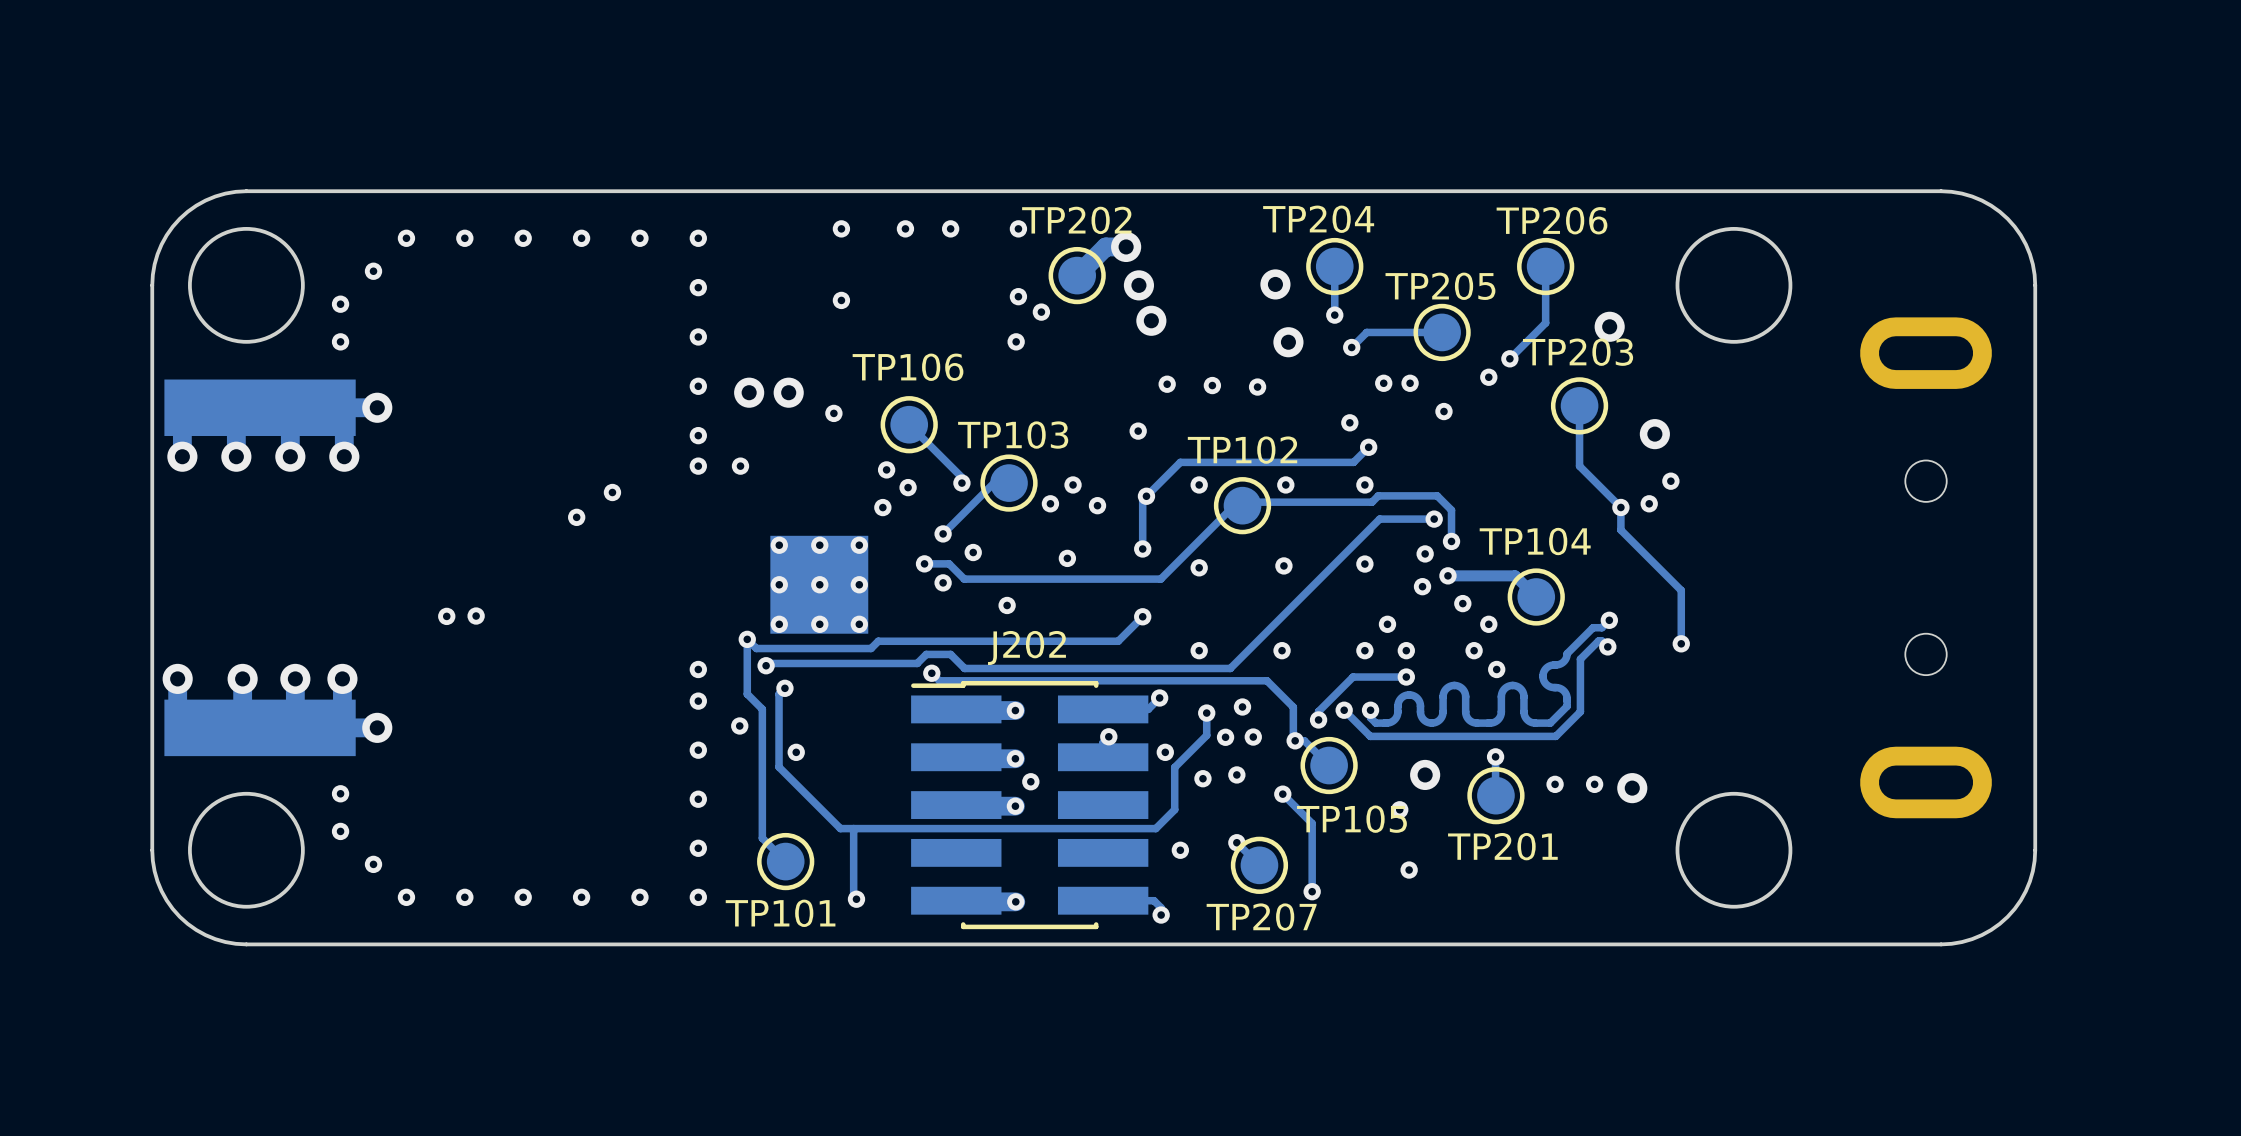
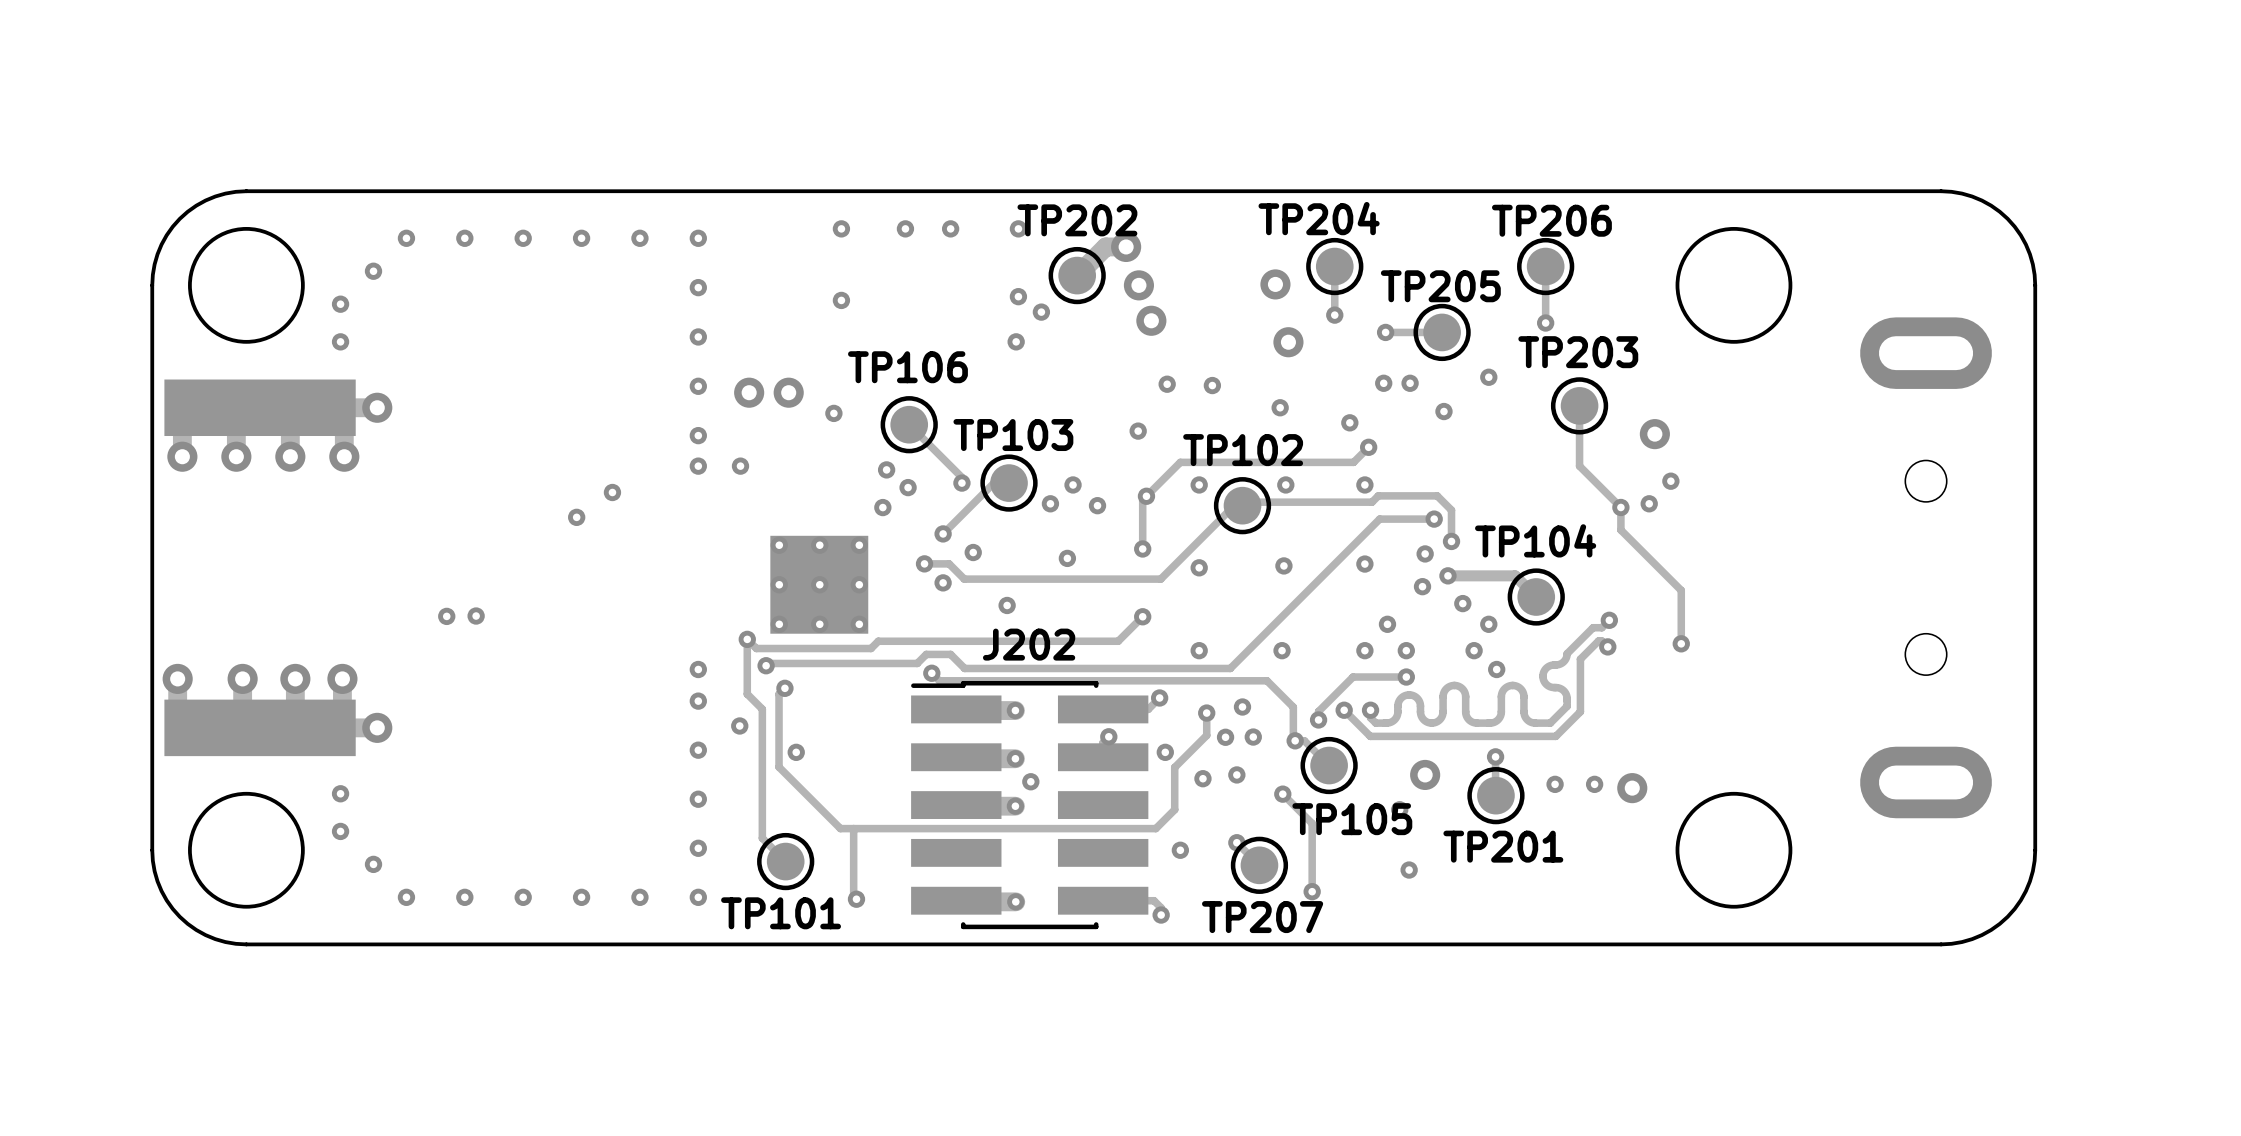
track: (1545, 323) (1509, 358) -> none
via: (1609, 326) -> none
track: (1385, 332) (1366, 332) (1351, 347) -> none
via position: (1351, 347) -> (1385, 332)
via position: (1509, 358) -> (1545, 323)
via position: (1257, 387) -> (1280, 407)

